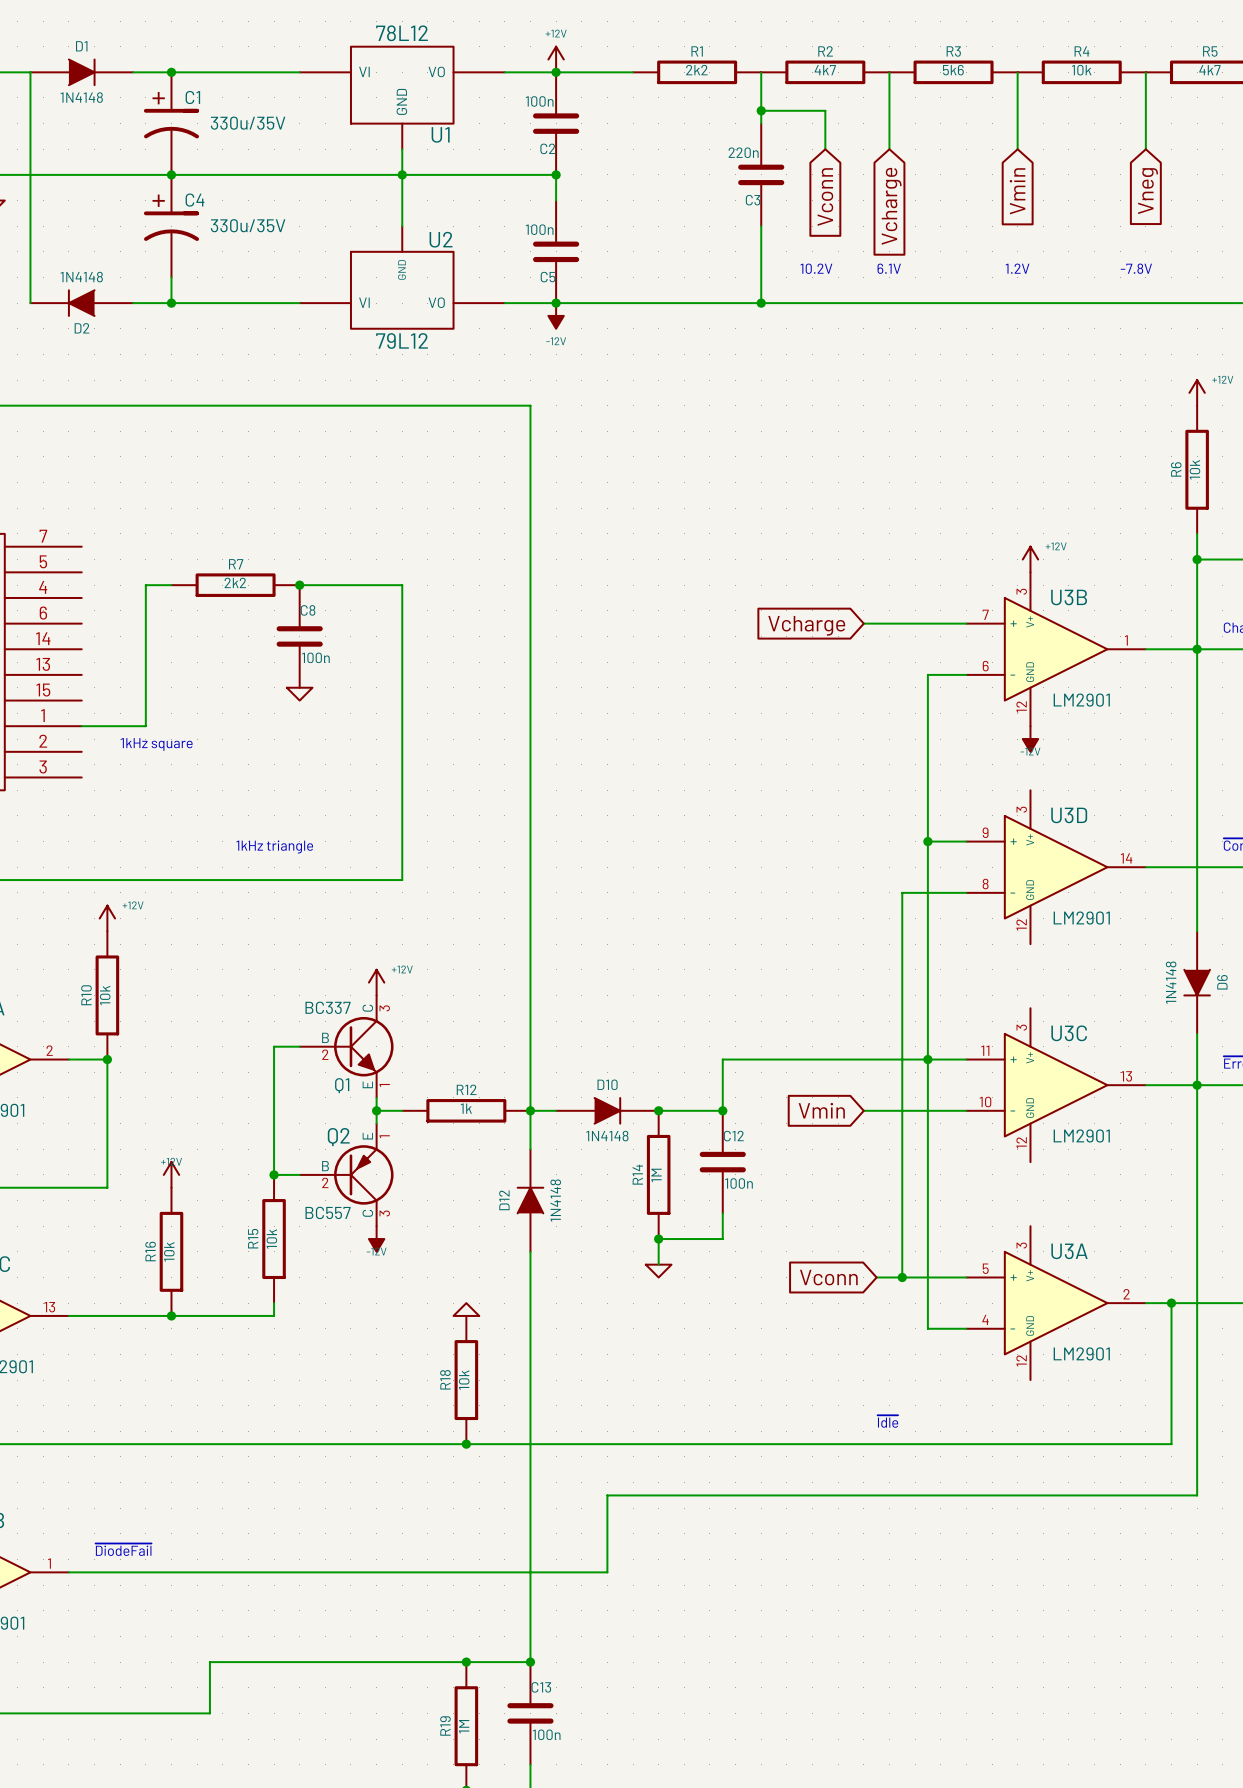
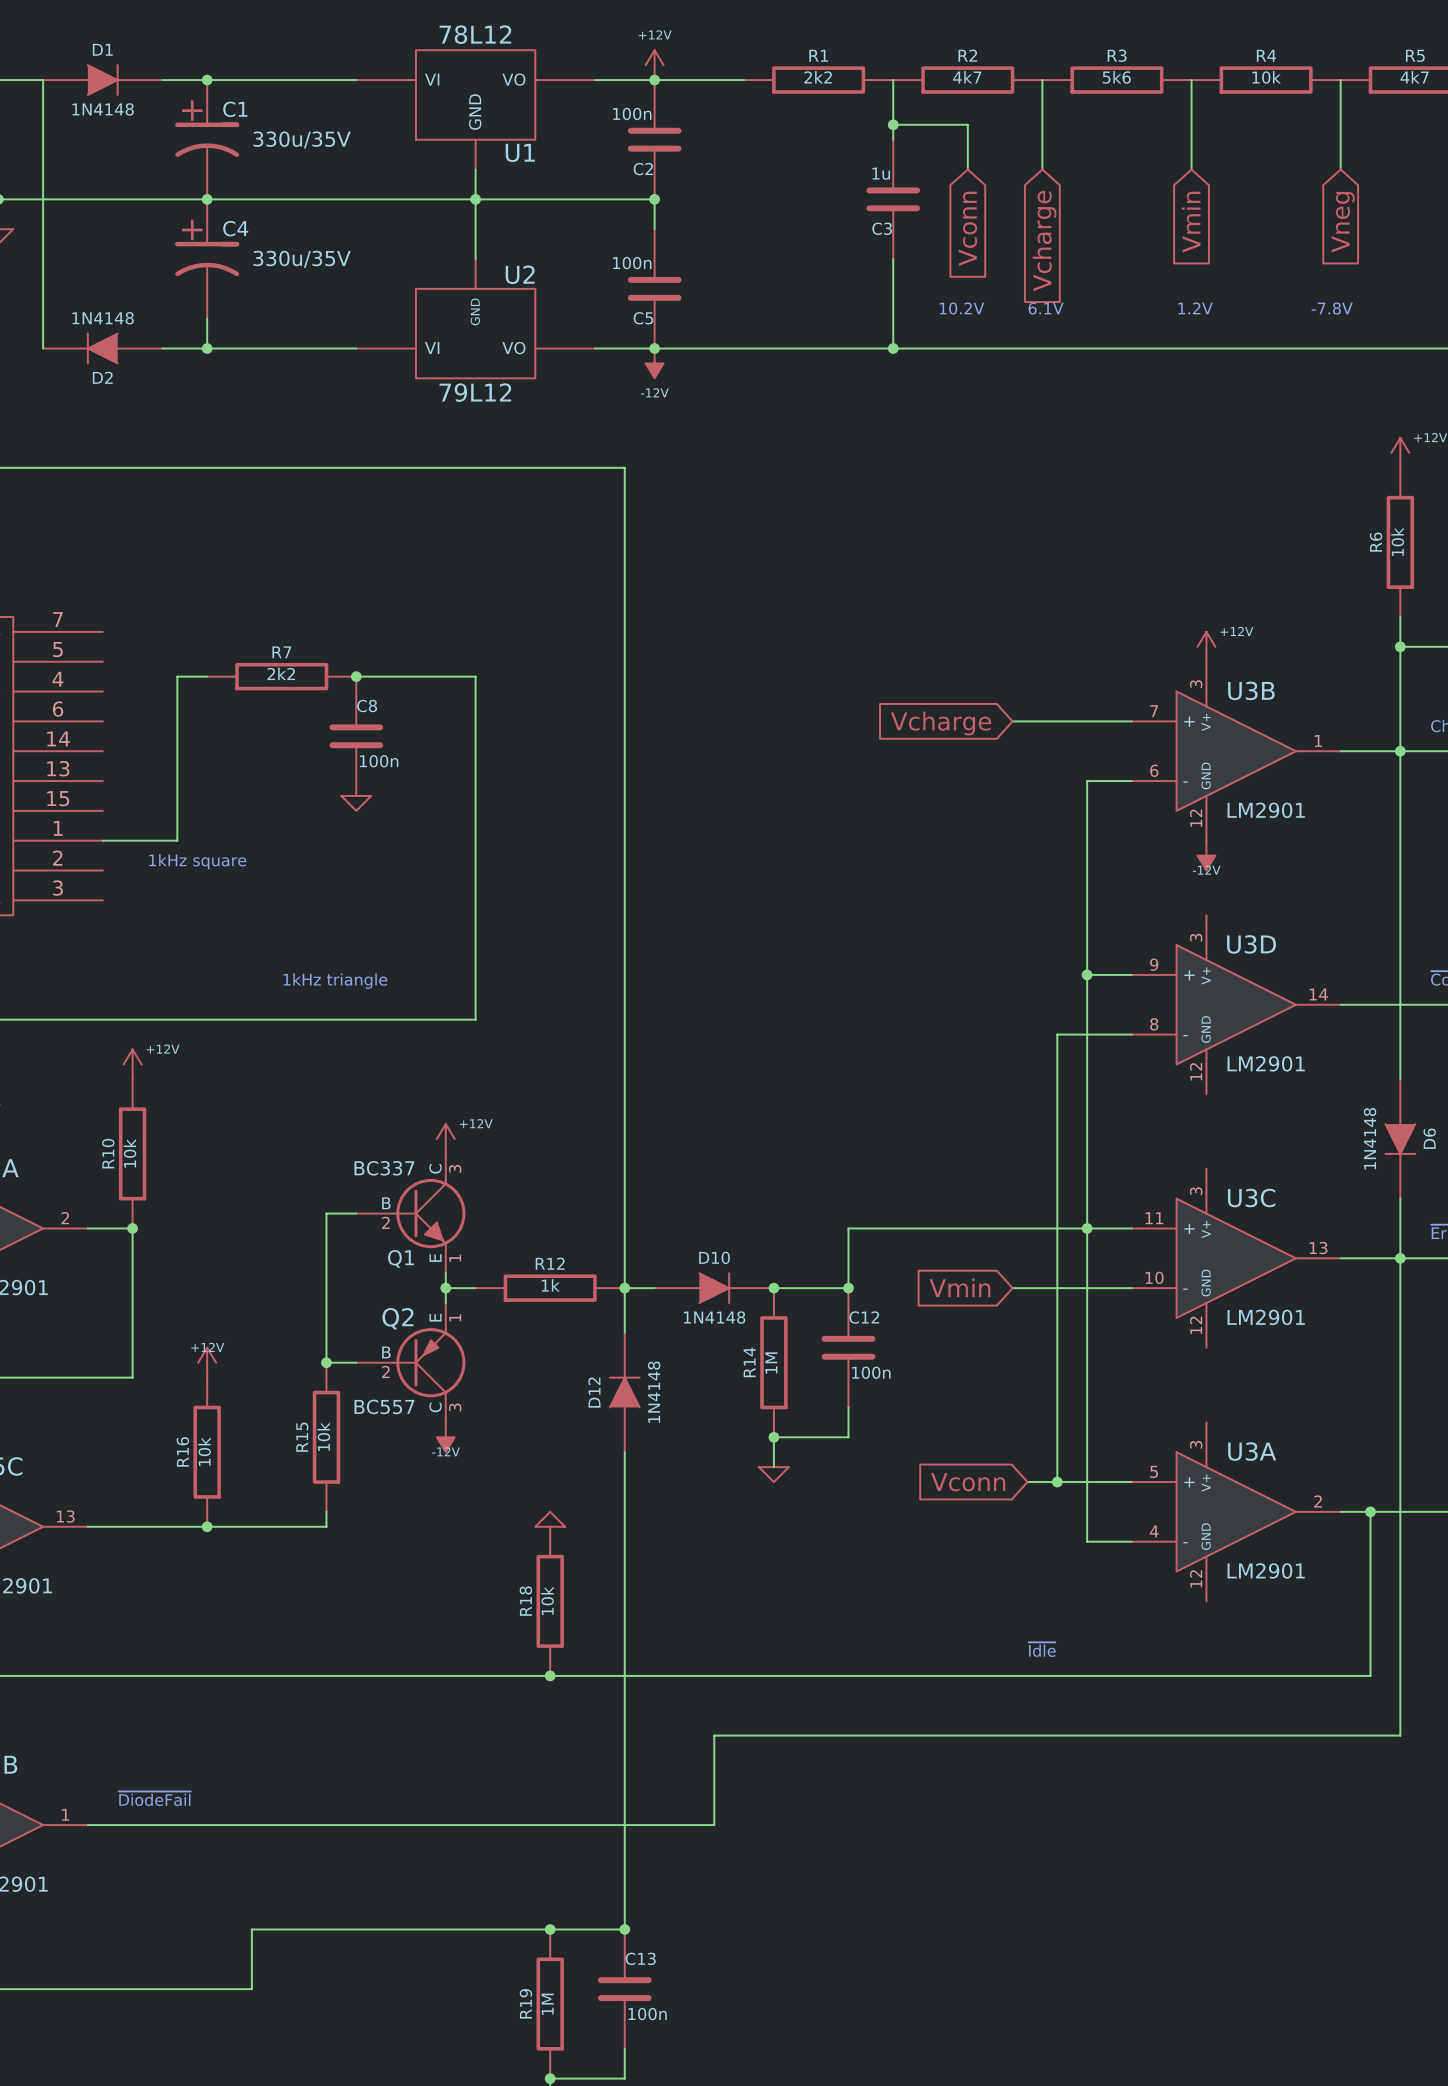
C3 value: 220n (743, 152) -> 1u (881, 173)

